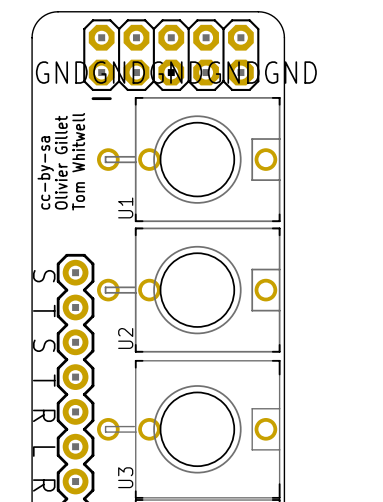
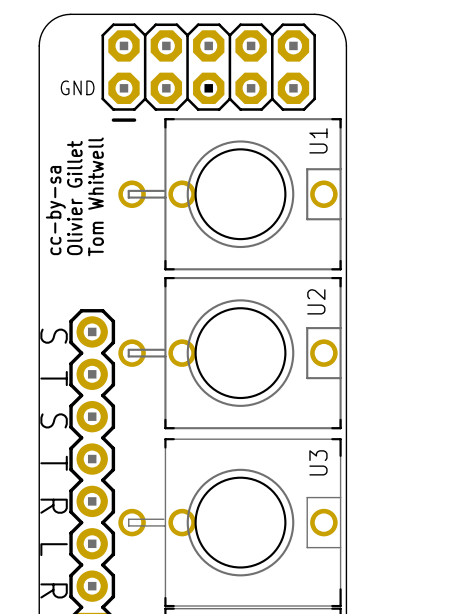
text: none -> GND (77, 87)
text: GNDGNDGNDGNDGND (176, 72) -> none
U1 name position: U1 (125, 207) -> U1 (318, 140)
U2 name position: U2 (125, 338) -> U2 (316, 301)
U3 name position: U3 (125, 477) -> U3 (318, 462)

